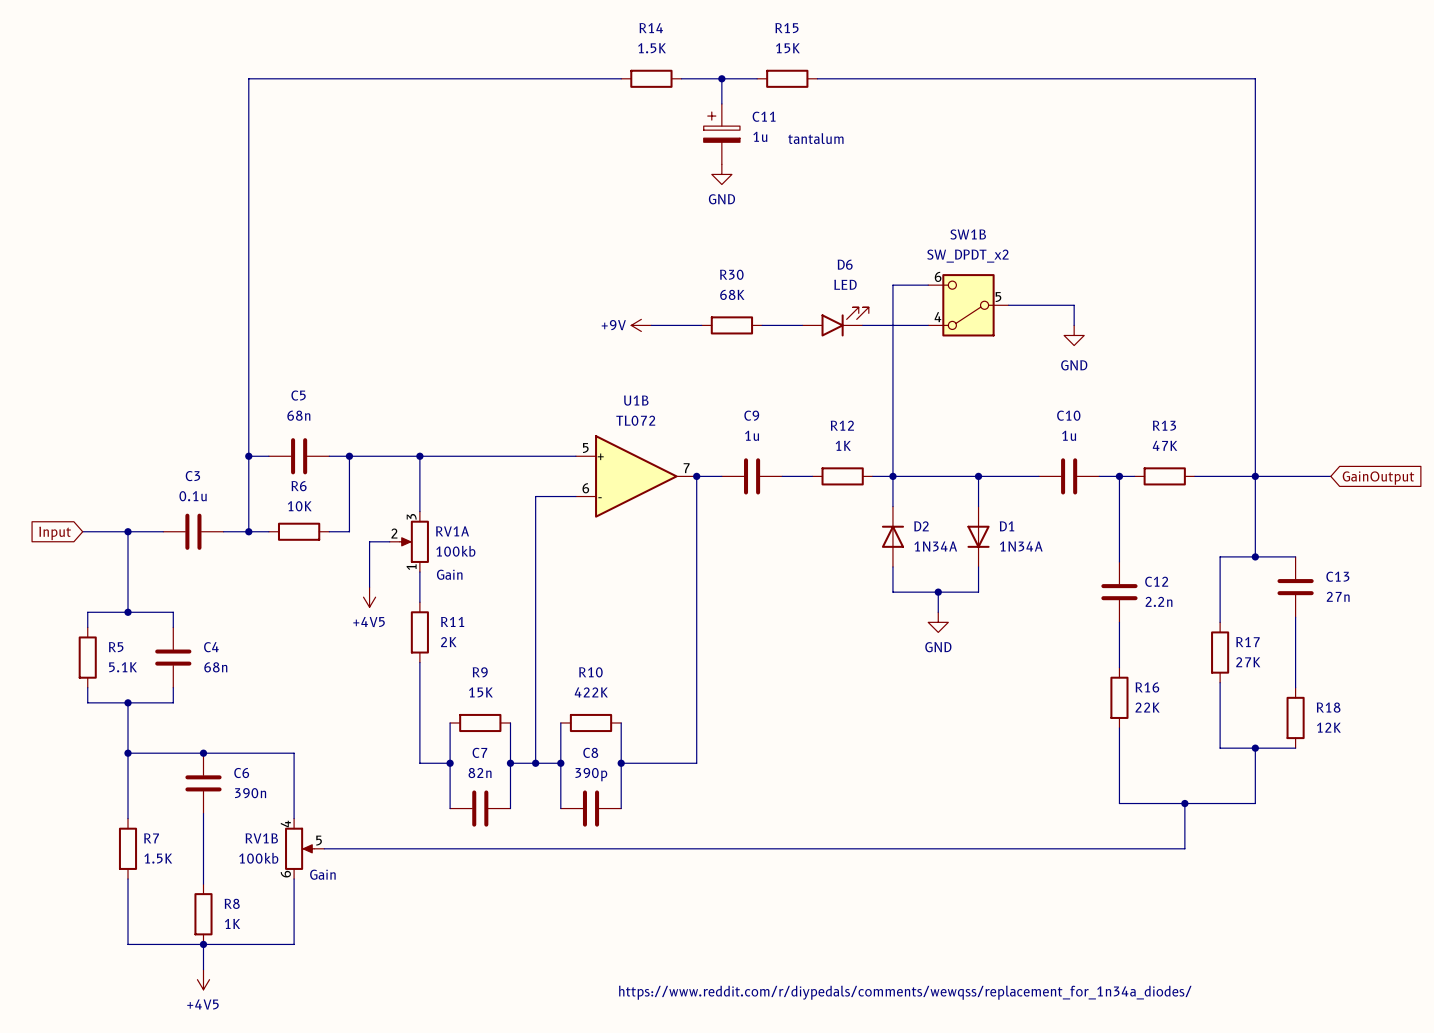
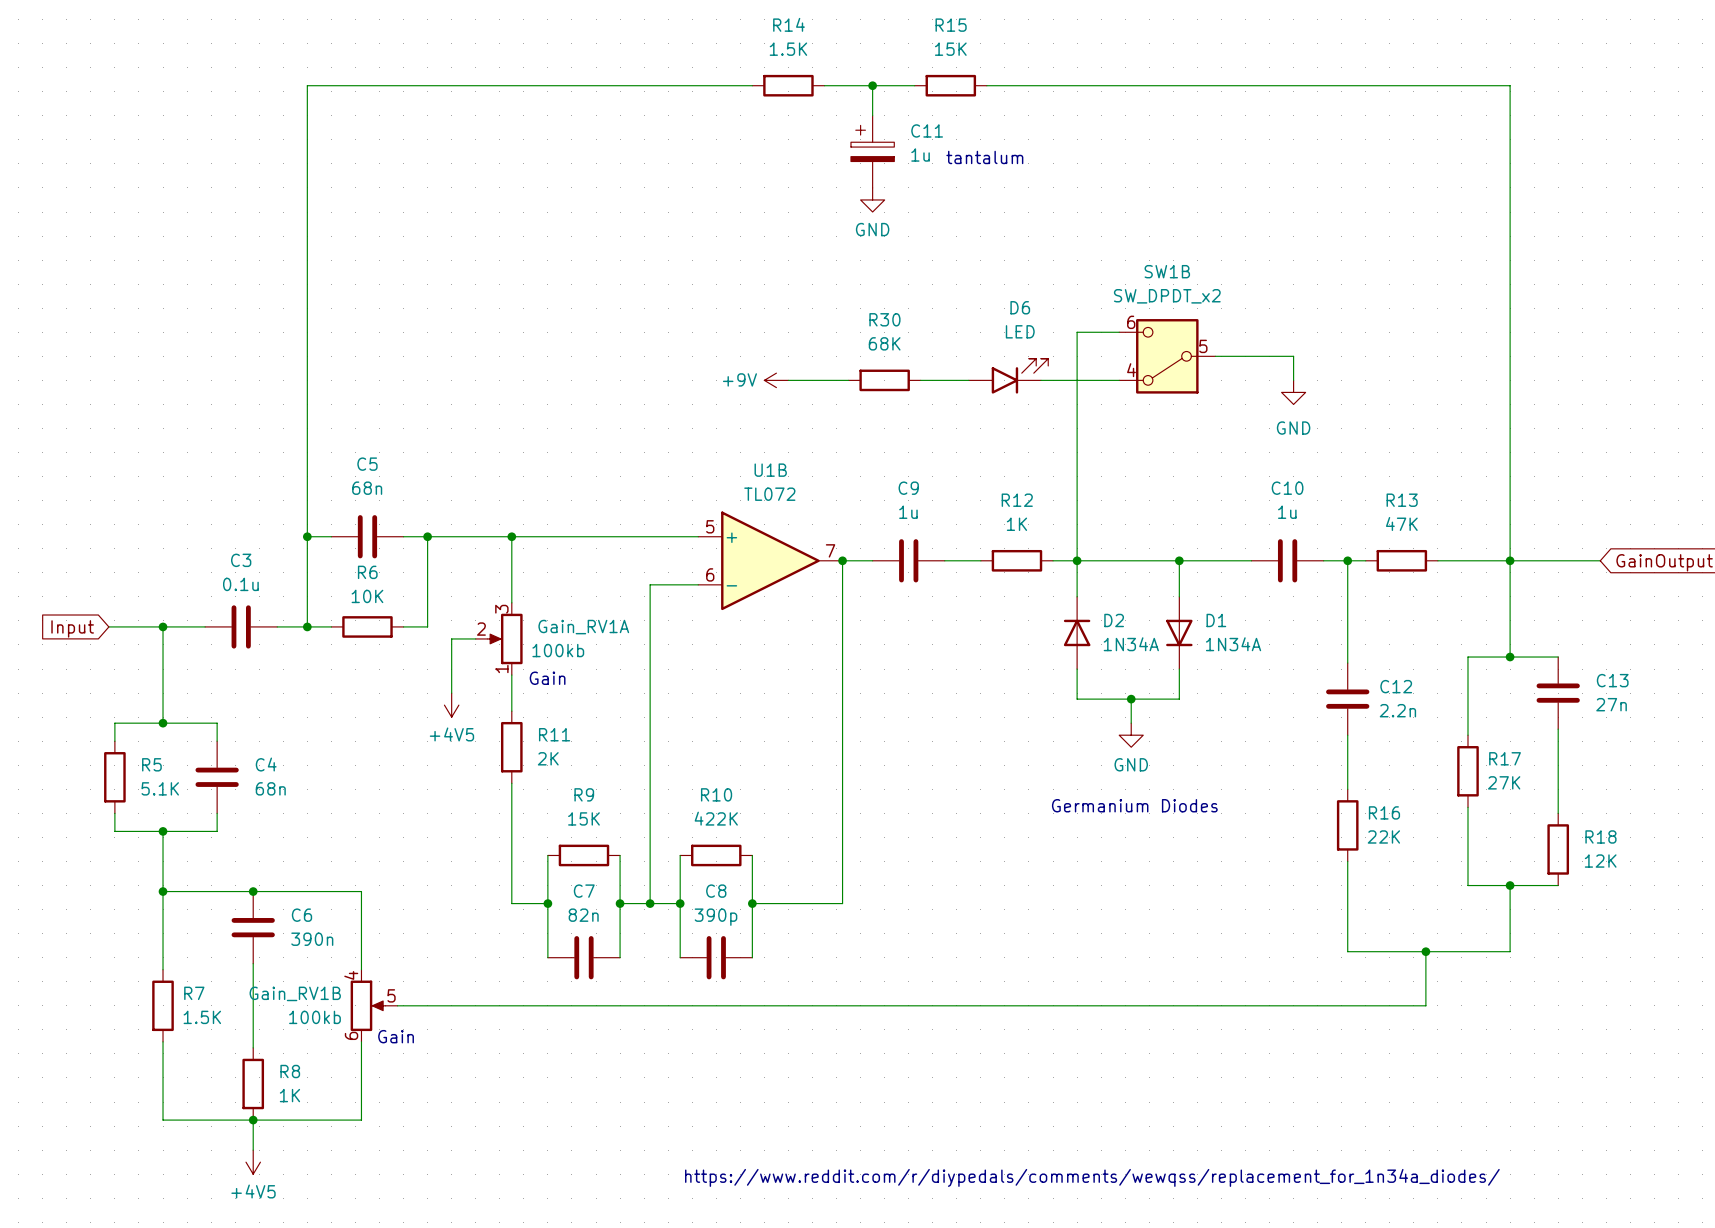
RV1A name: RV1A (452, 531) -> Gain_RV1A (583, 627)
text: none -> Germanium Diodes (1134, 805)
RV1B name: RV1B (261, 838) -> Gain_RV1B (295, 993)

